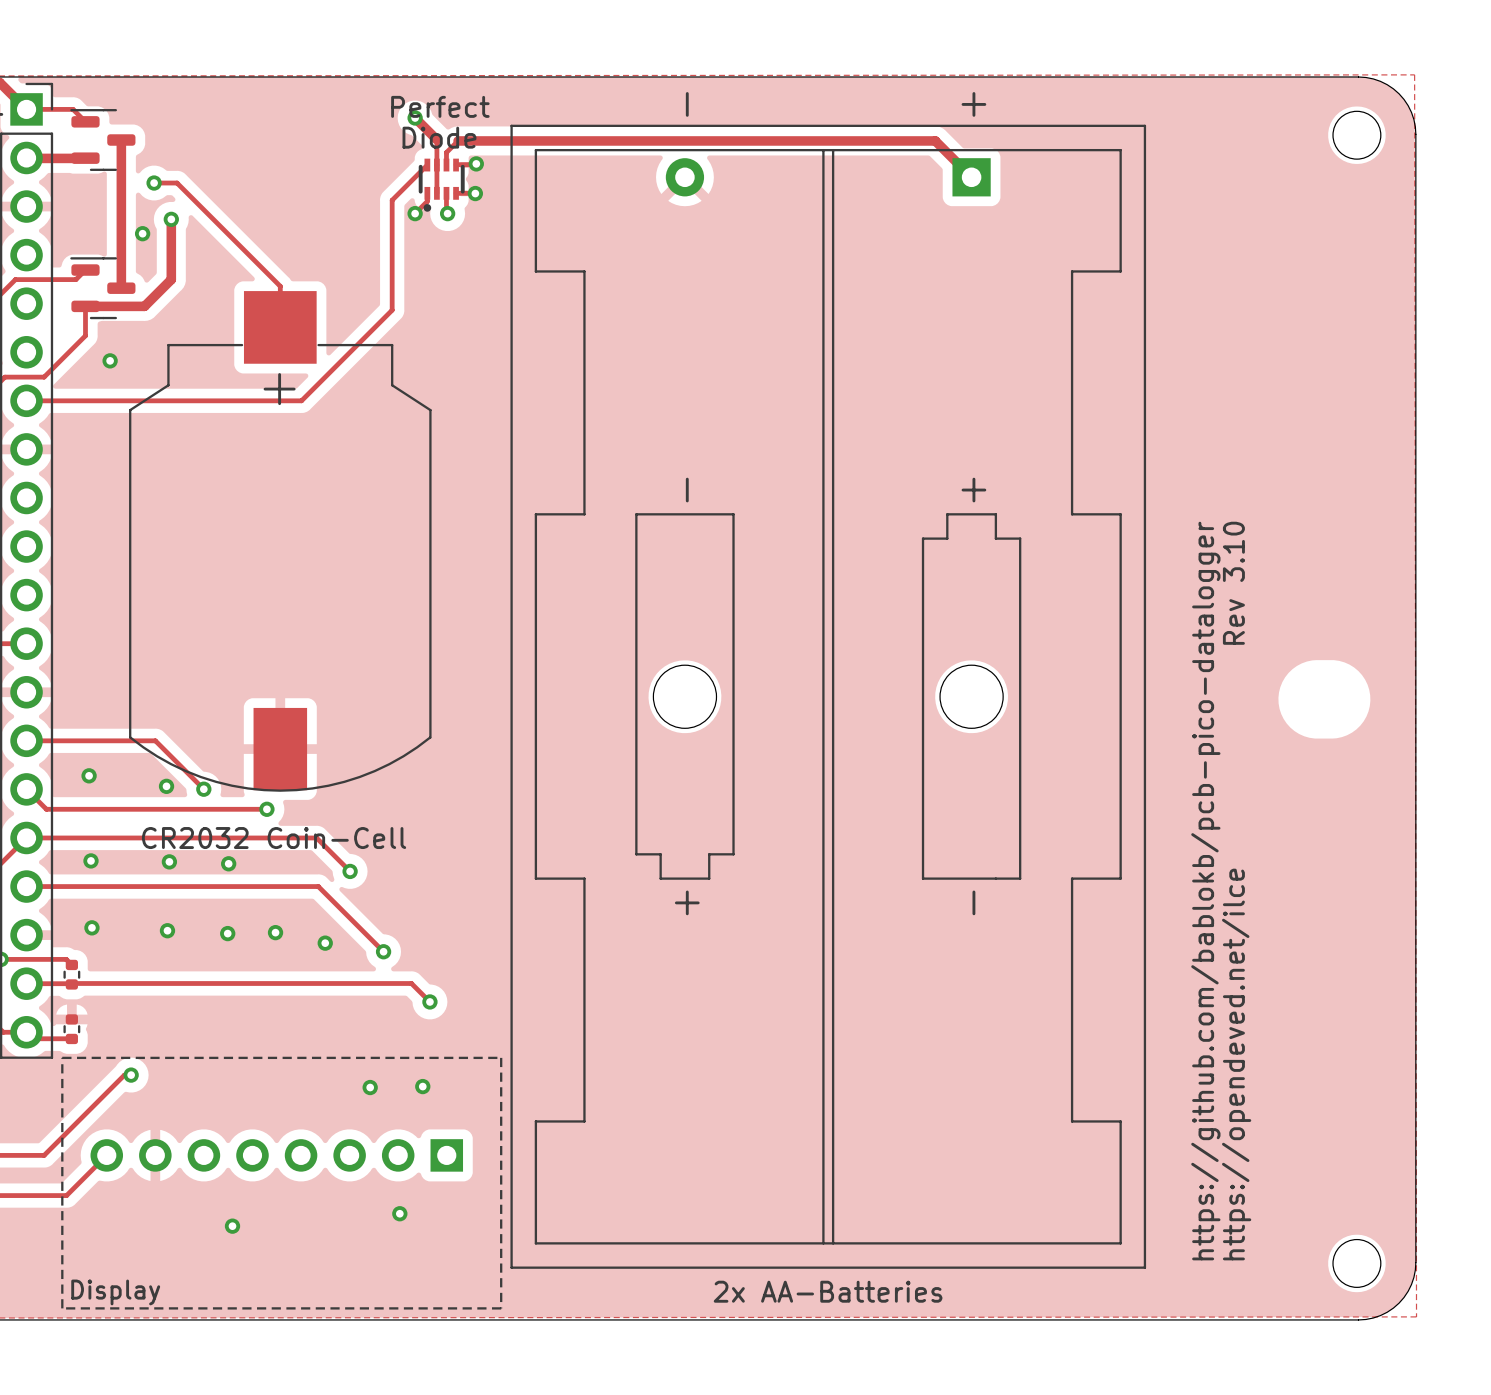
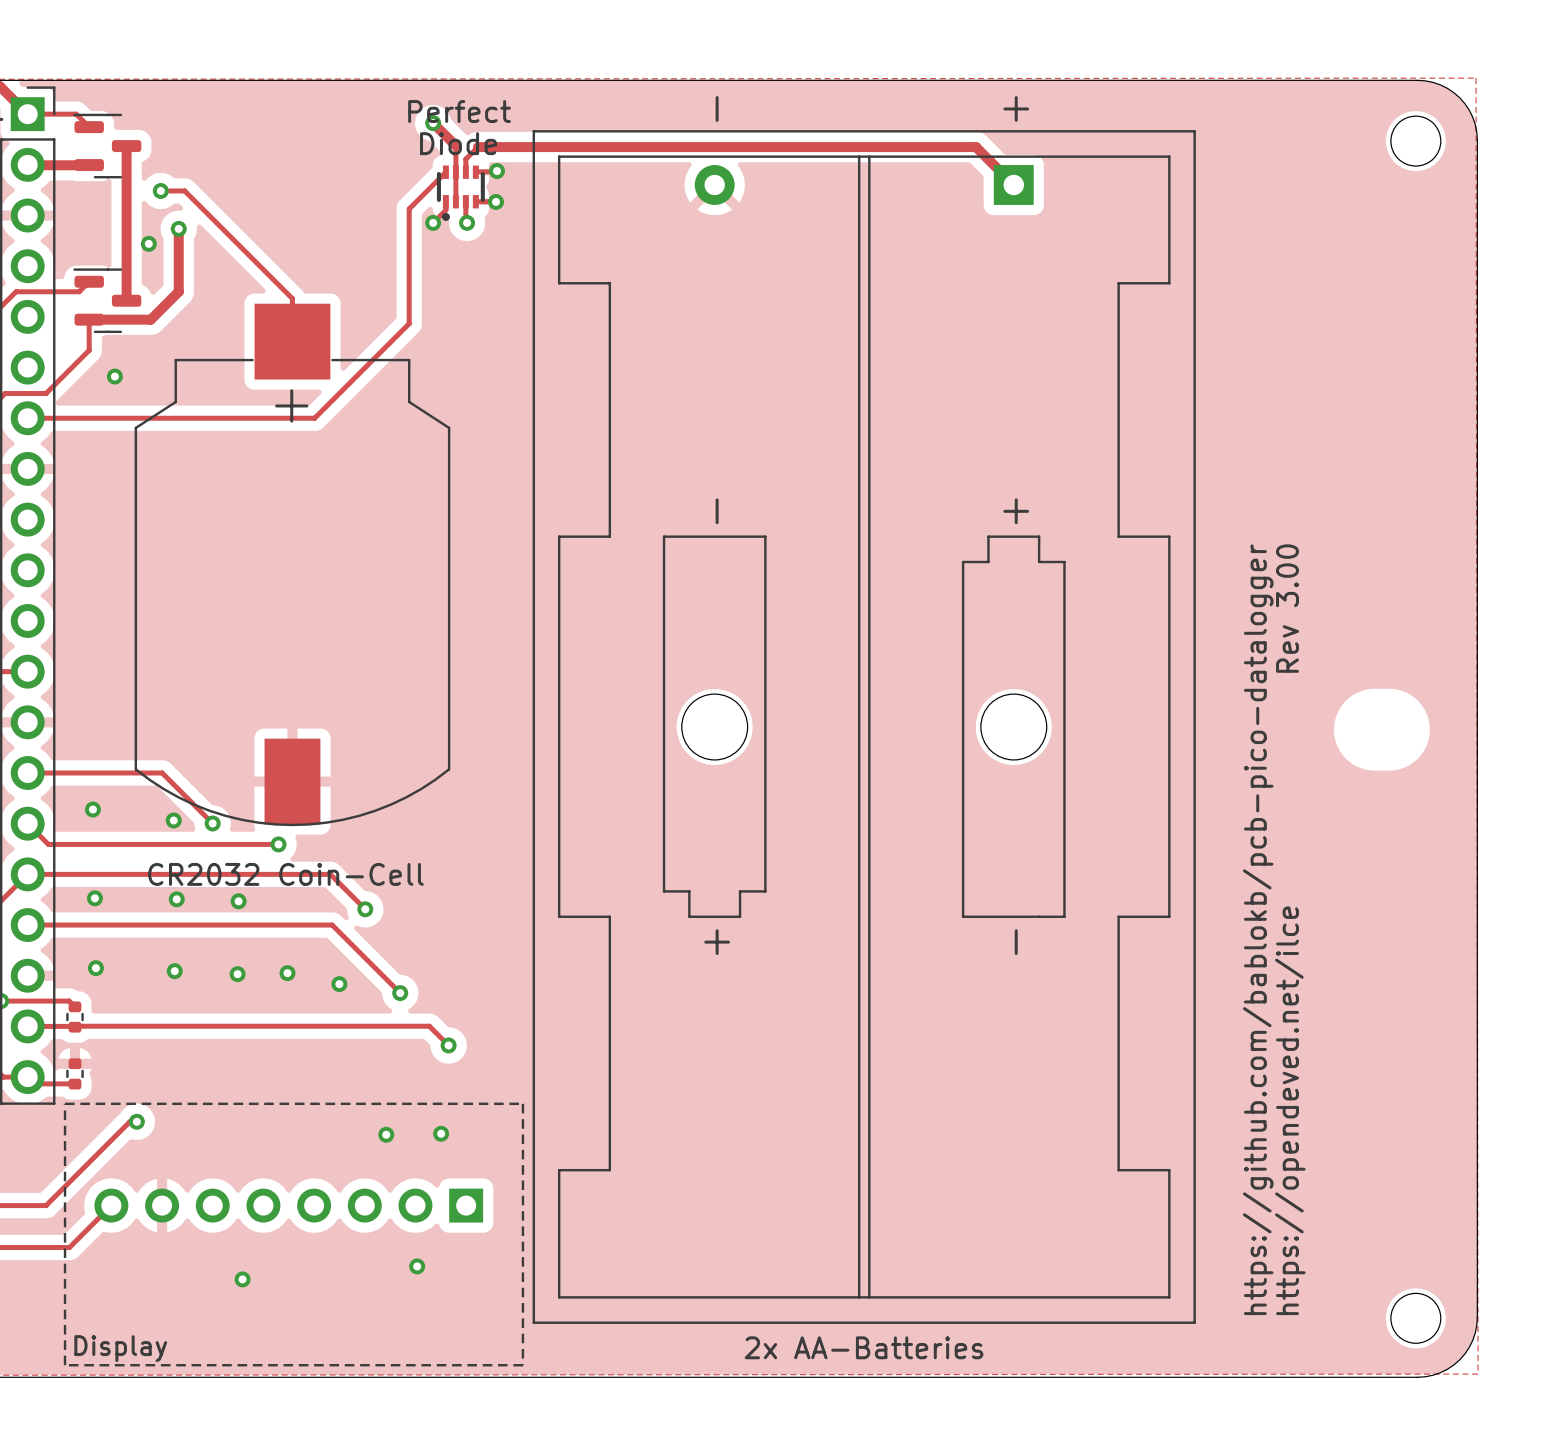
text: https://opendeved.net/ilce Rev 3.10 (1236, 891) -> https://opendeved.net/ilce Rev 3.00 (1290, 929)

